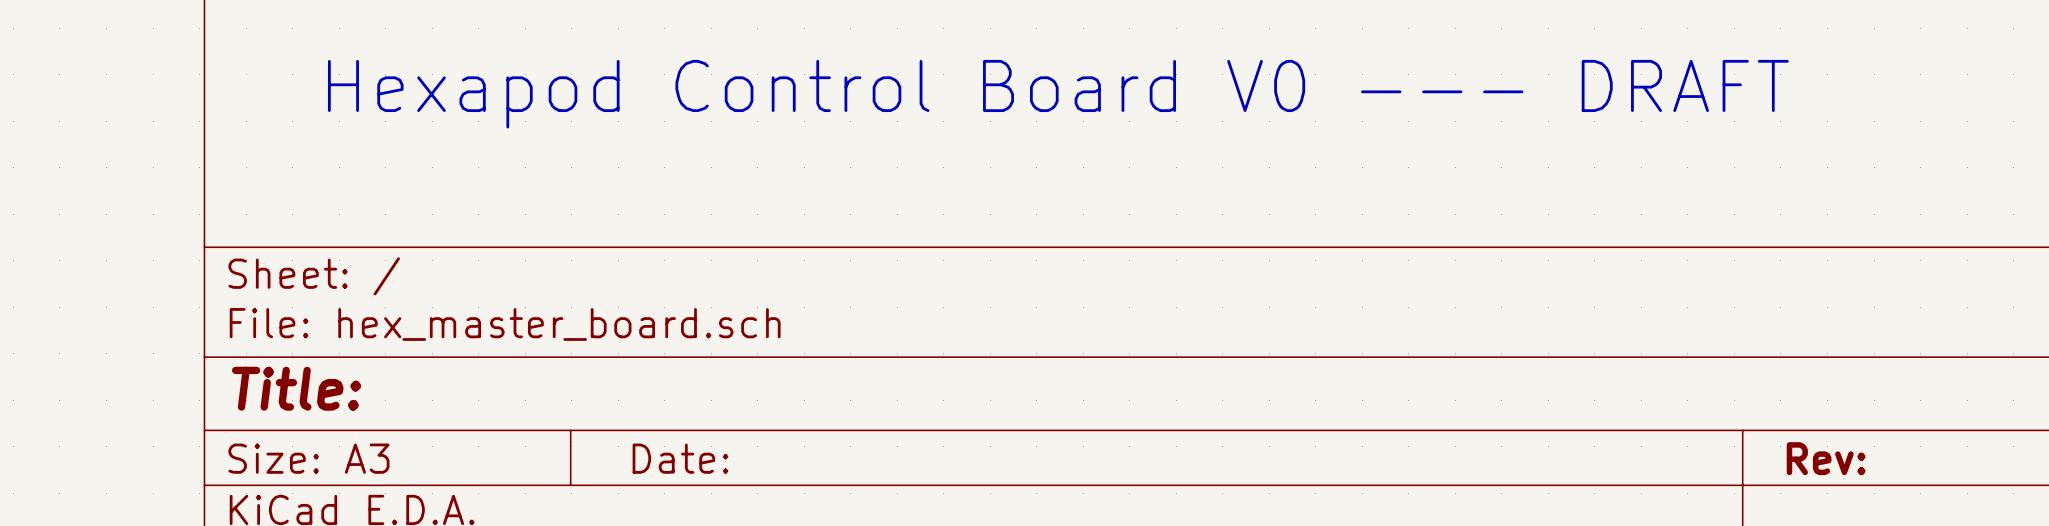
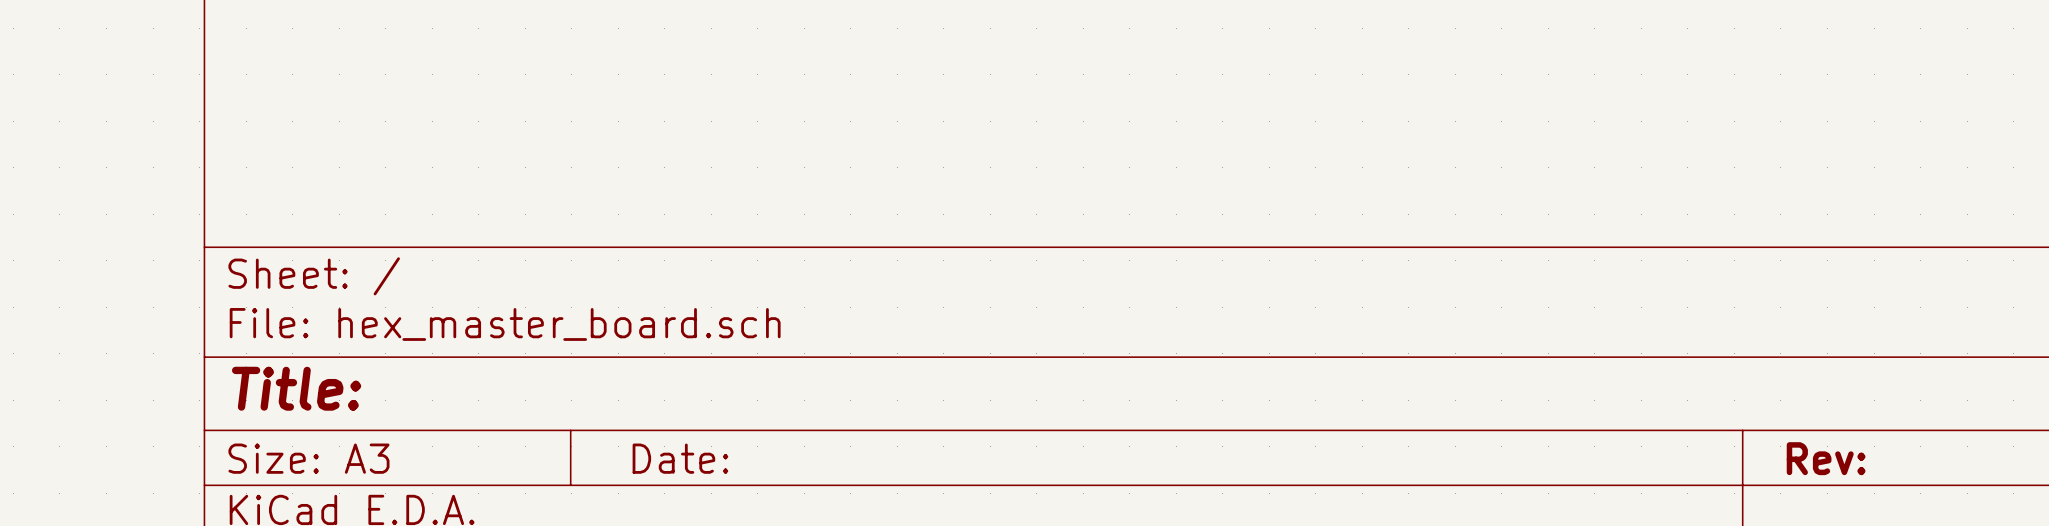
text: Hexapod Control Board V0 --- DRAFT (1058, 94) -> none

